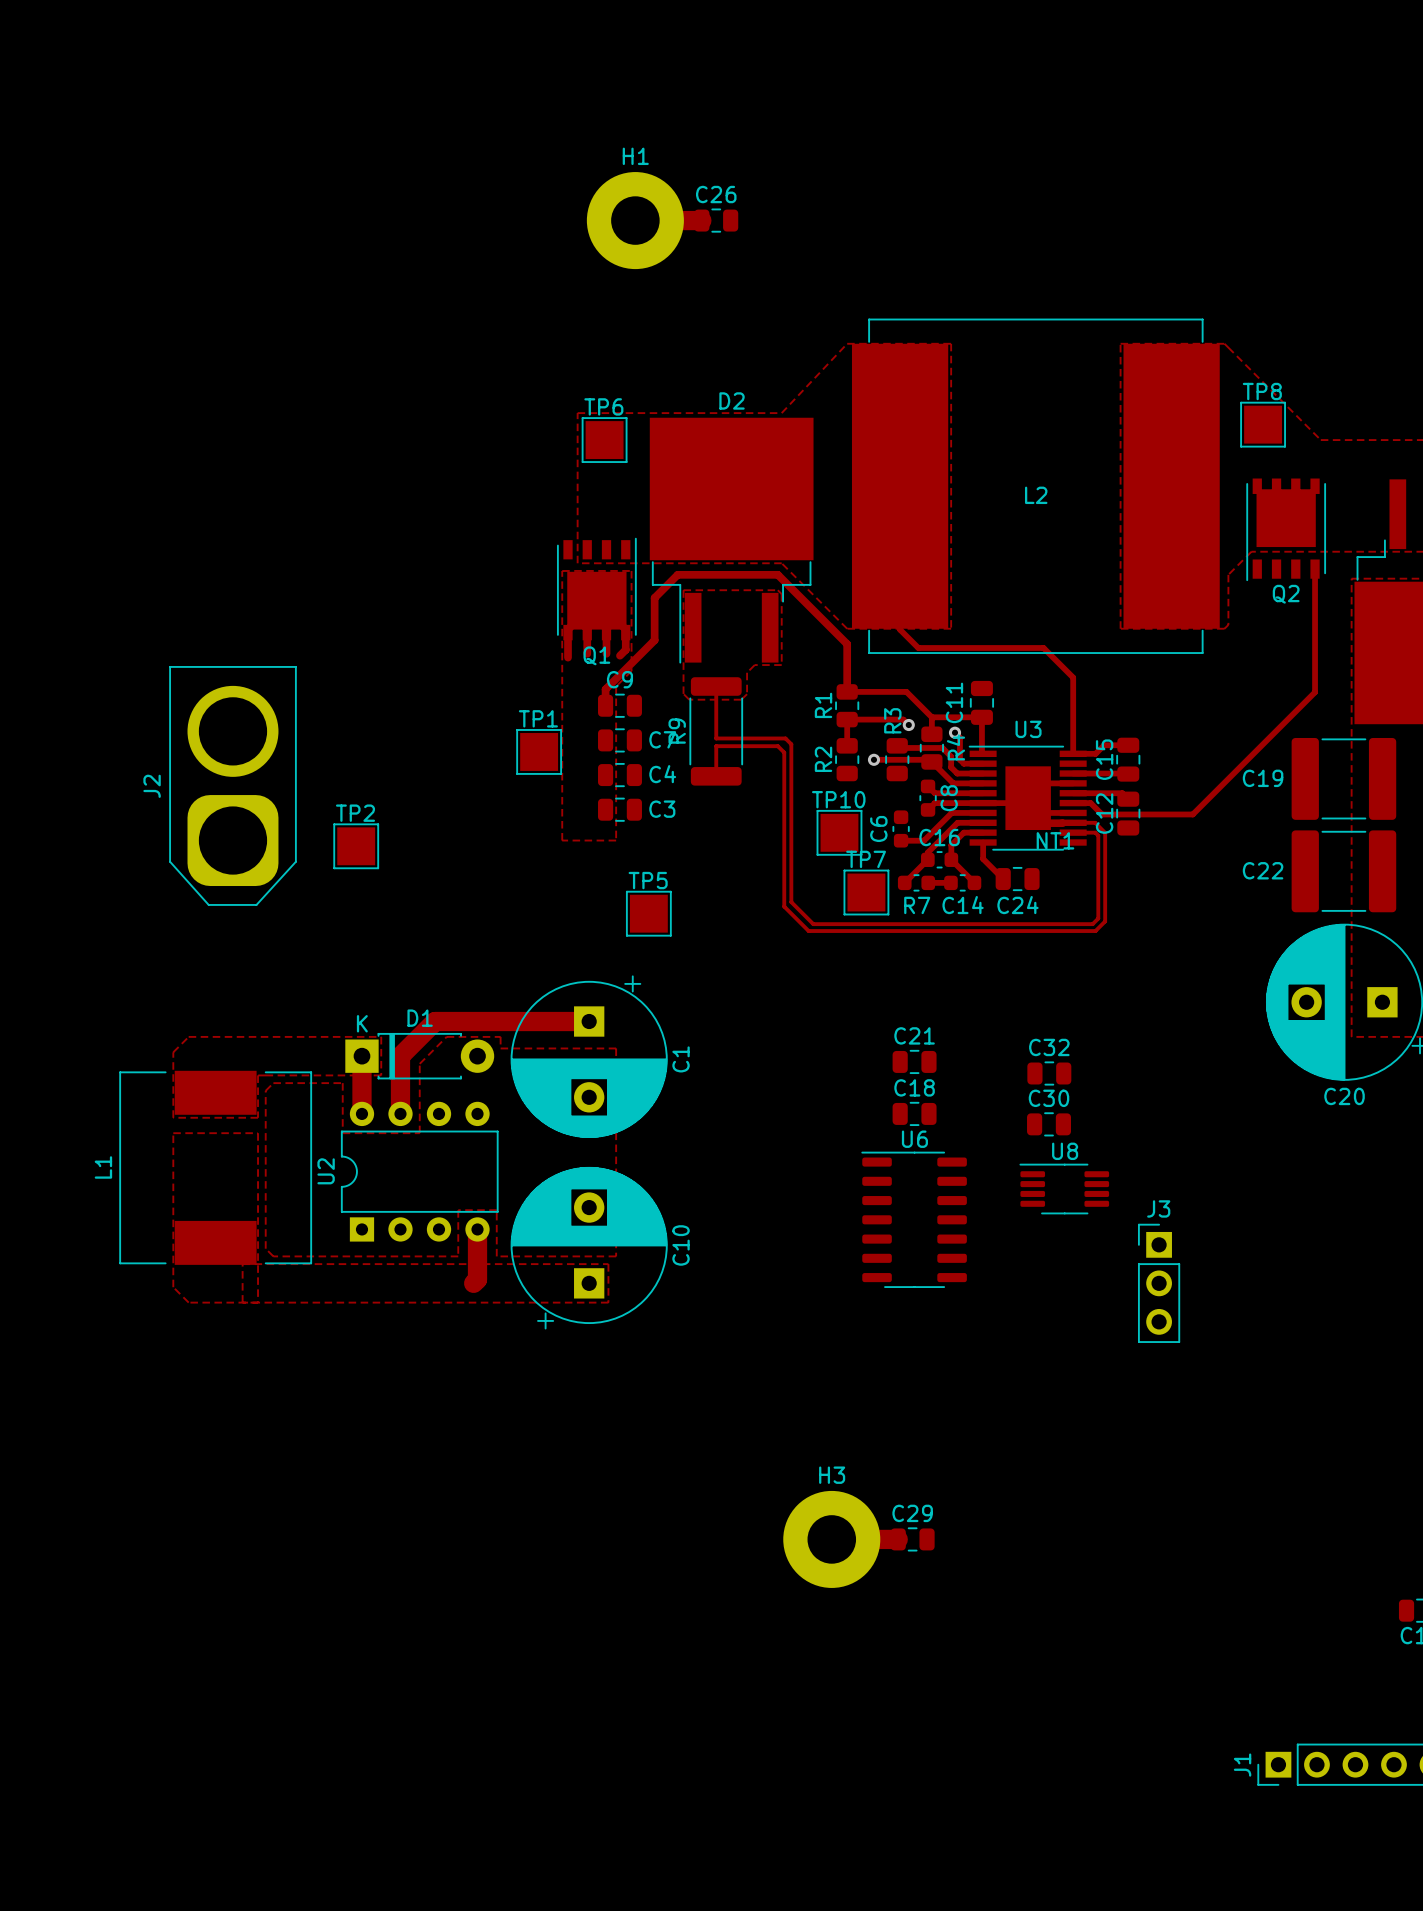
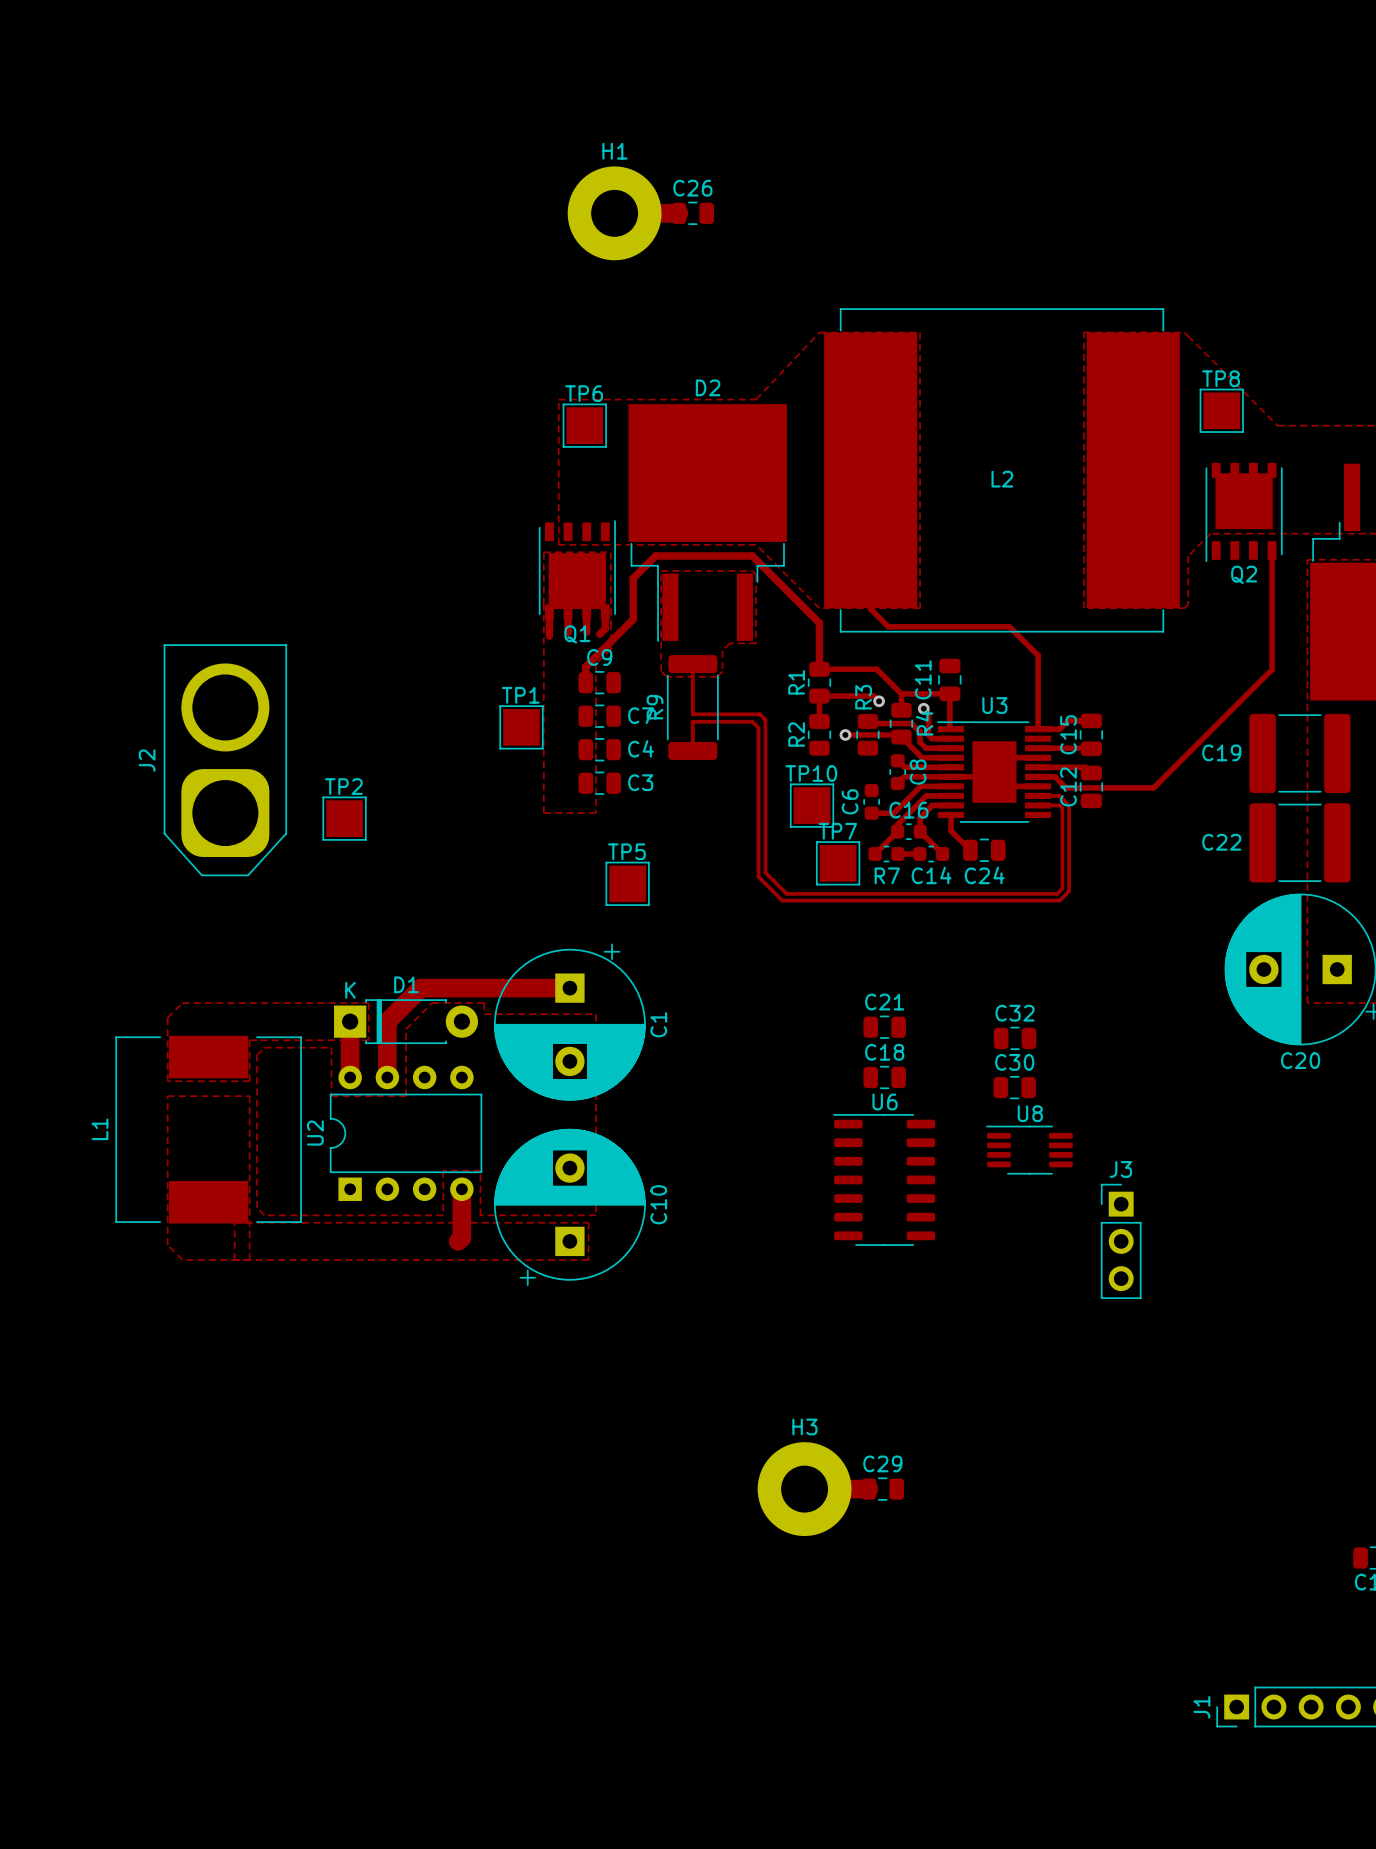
NT1: (1055, 823) -> none

